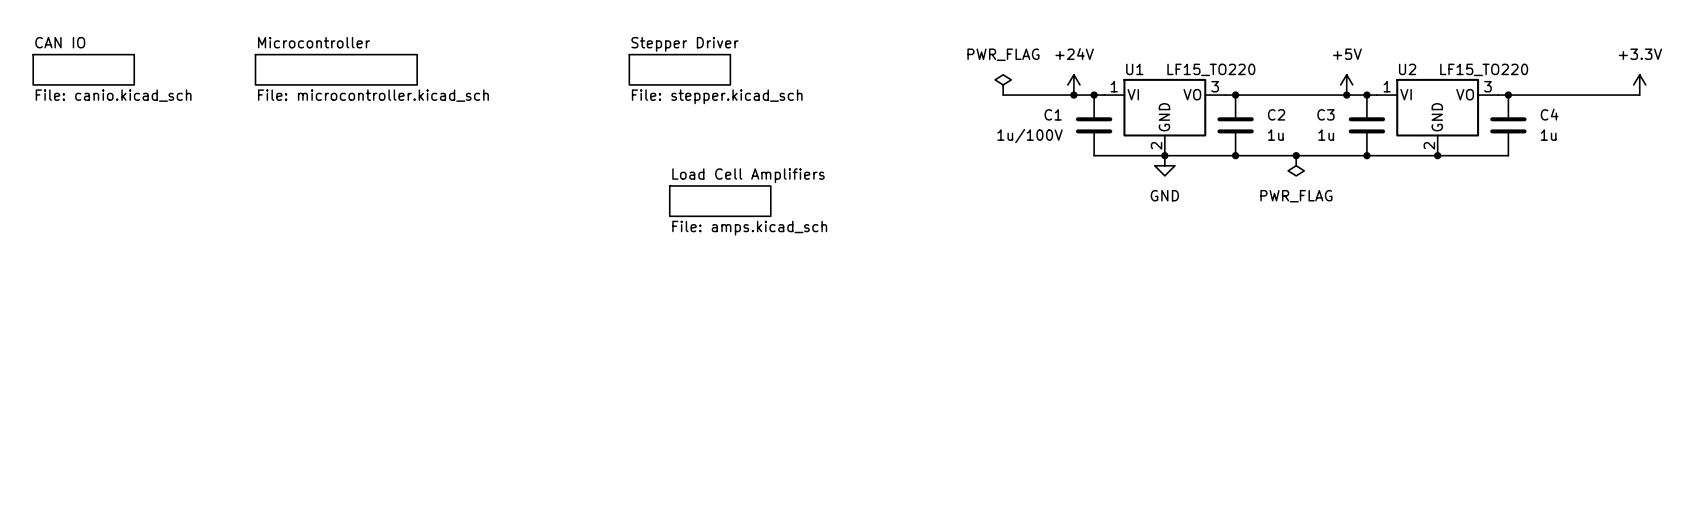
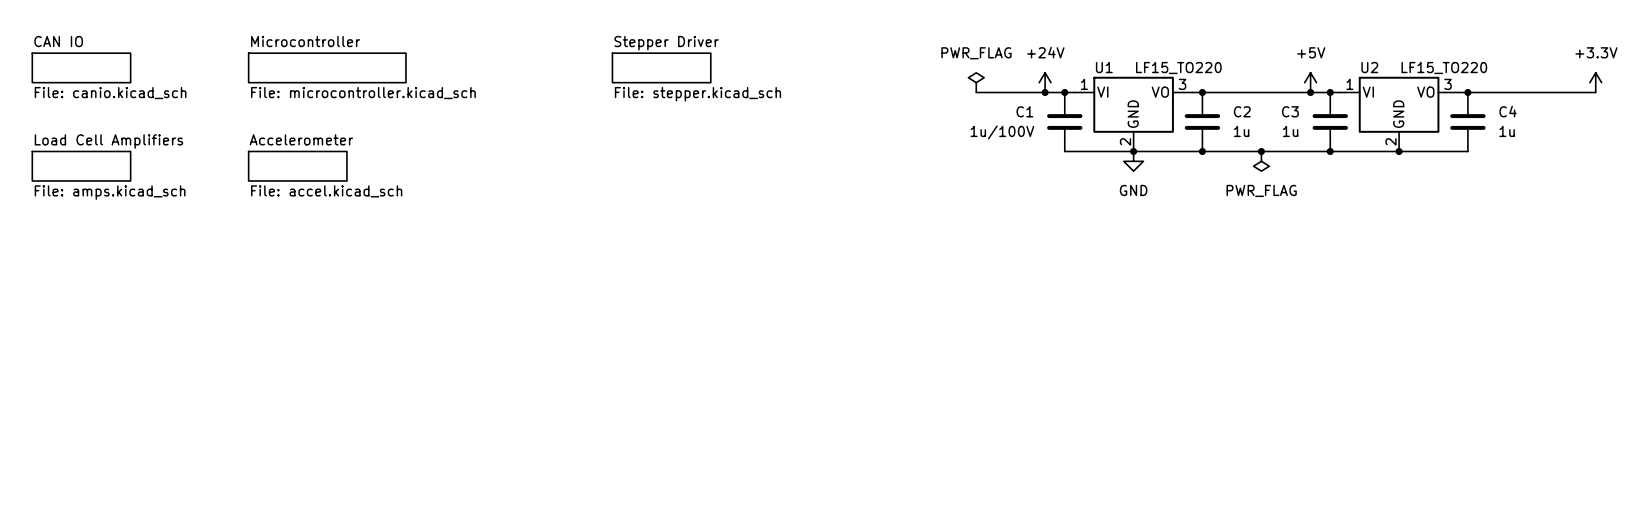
sheet Load Cell Amplifiers: none -> File: amps.kicad_sch (81, 166)
sheet Accelerometer: none -> File: accel.kicad_sch (297, 166)
sheet Load Cell Amplifiers: File: amps.kicad_sch (720, 201) -> none

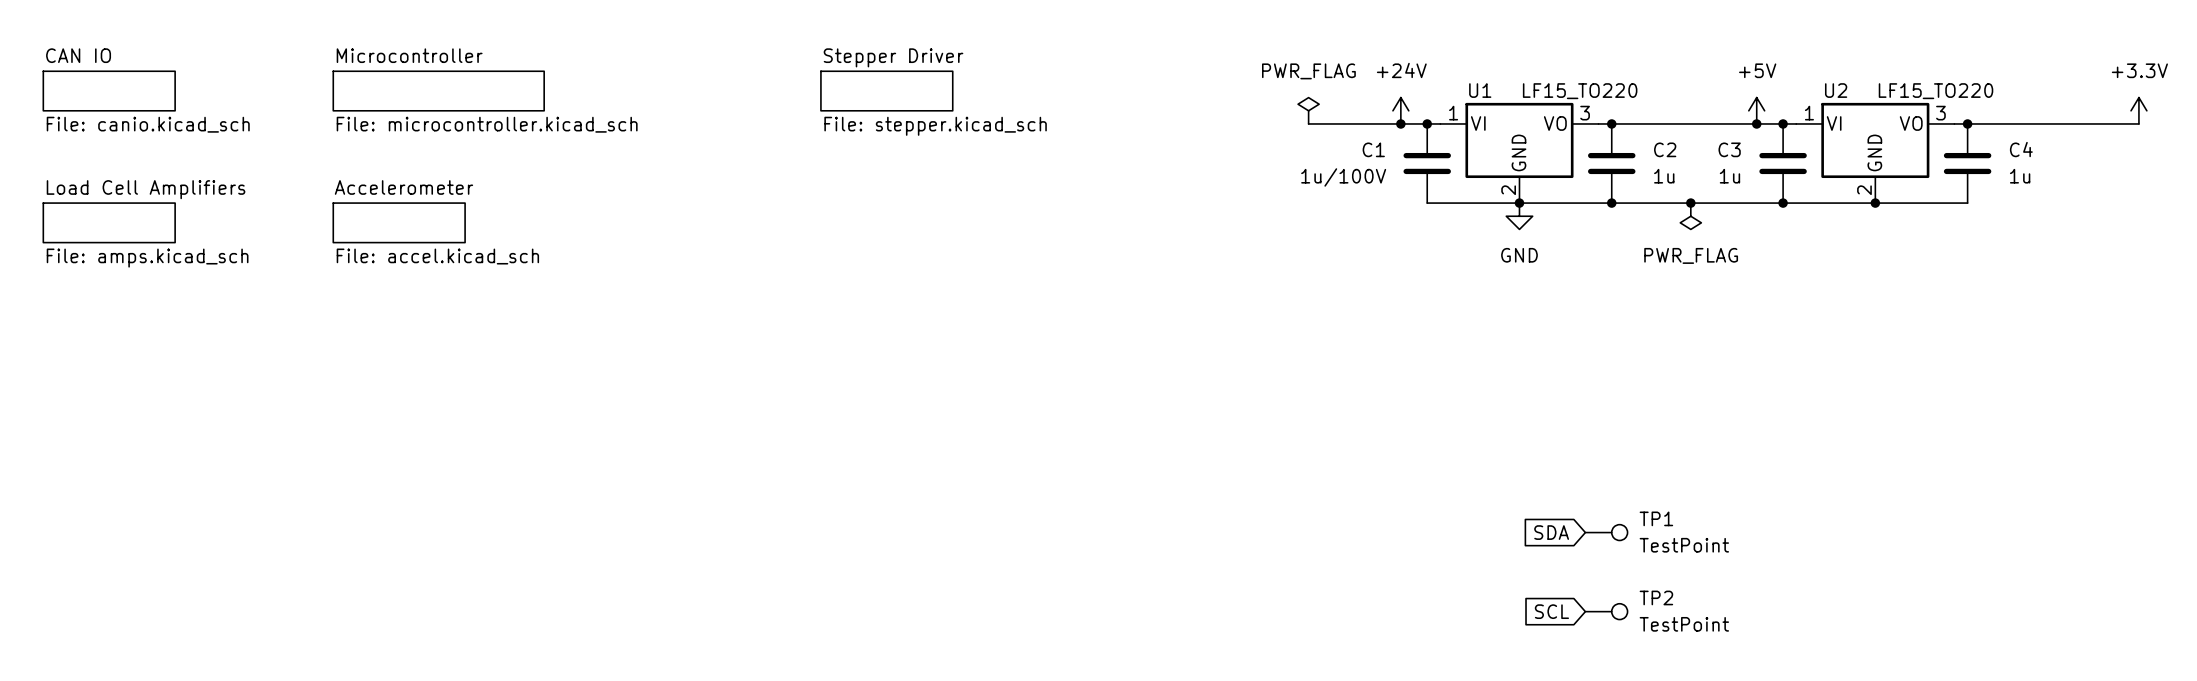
global label: none -> SDA (1551, 532)
TP1: none -> TestPoint (1606, 532)
global label: none -> SCL (1551, 611)
TP2: none -> TestPoint (1606, 611)

